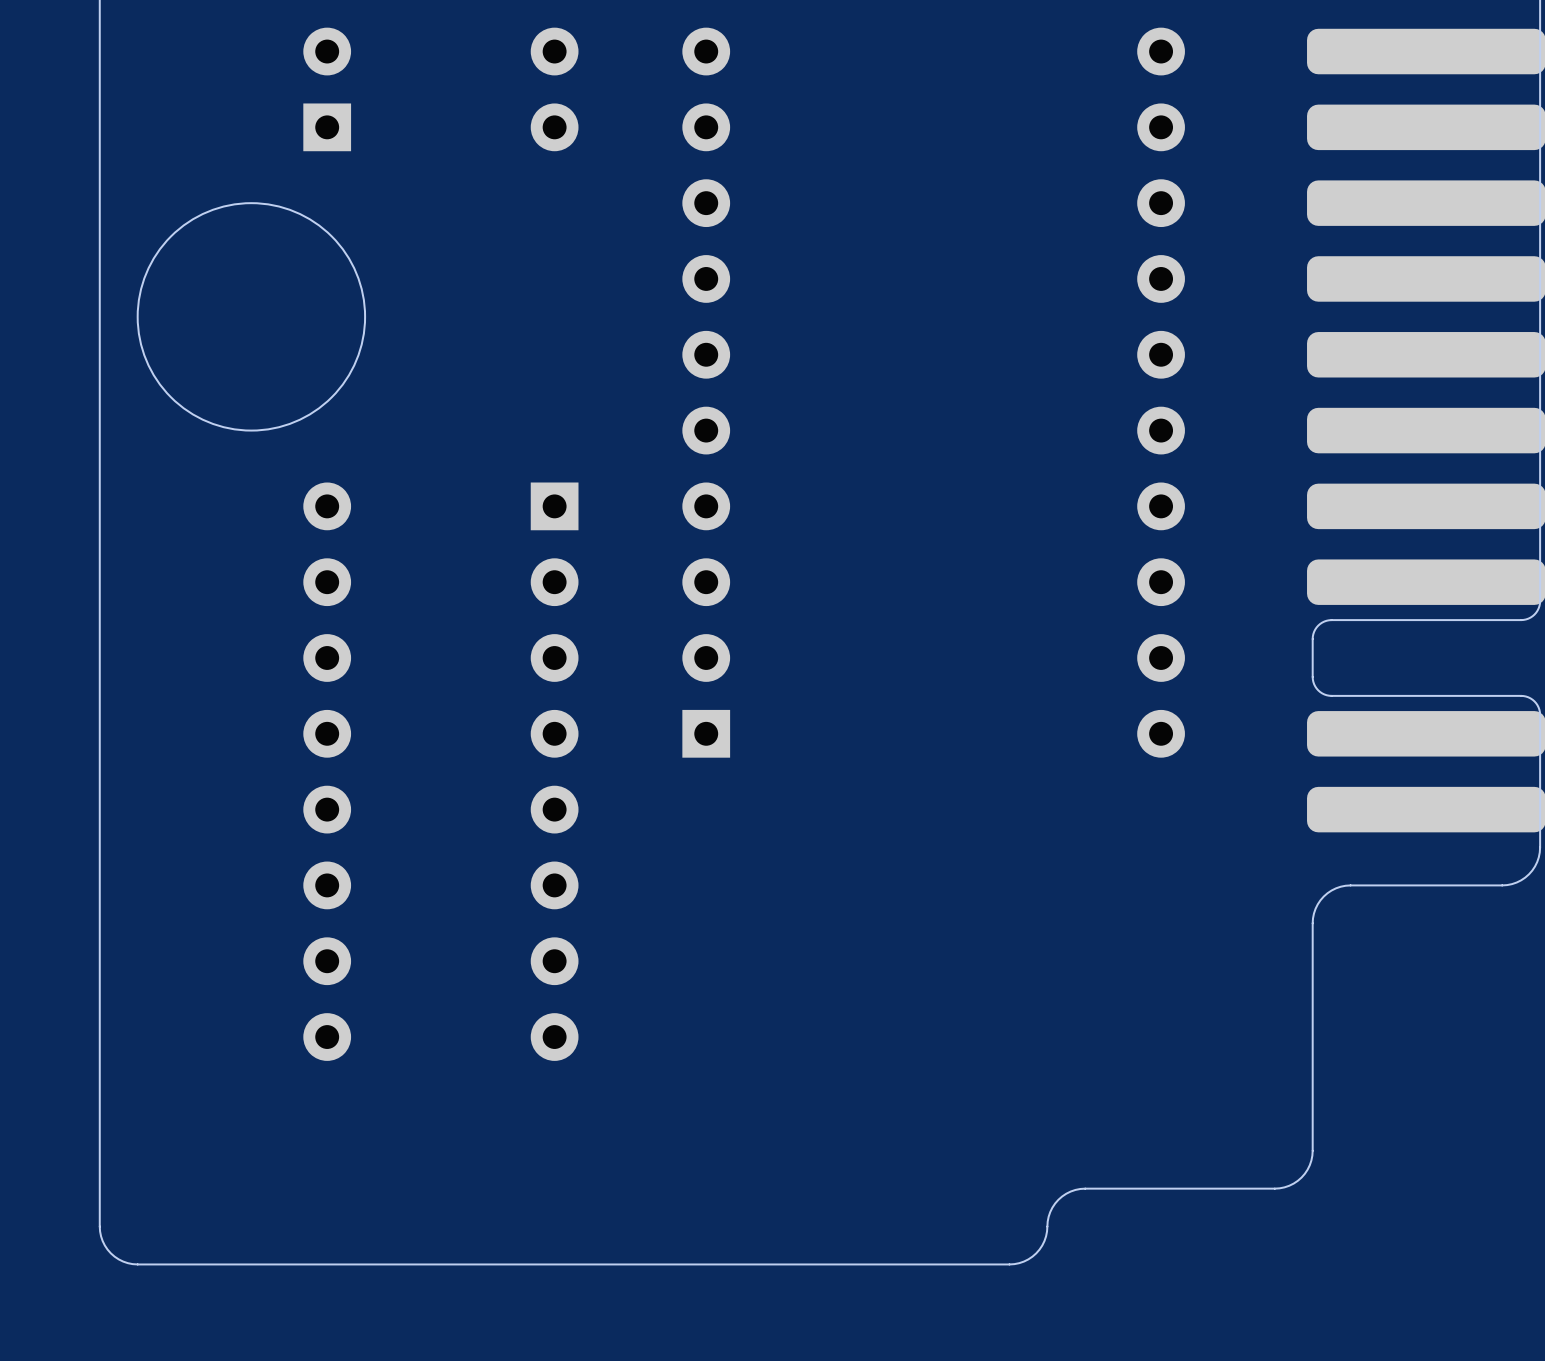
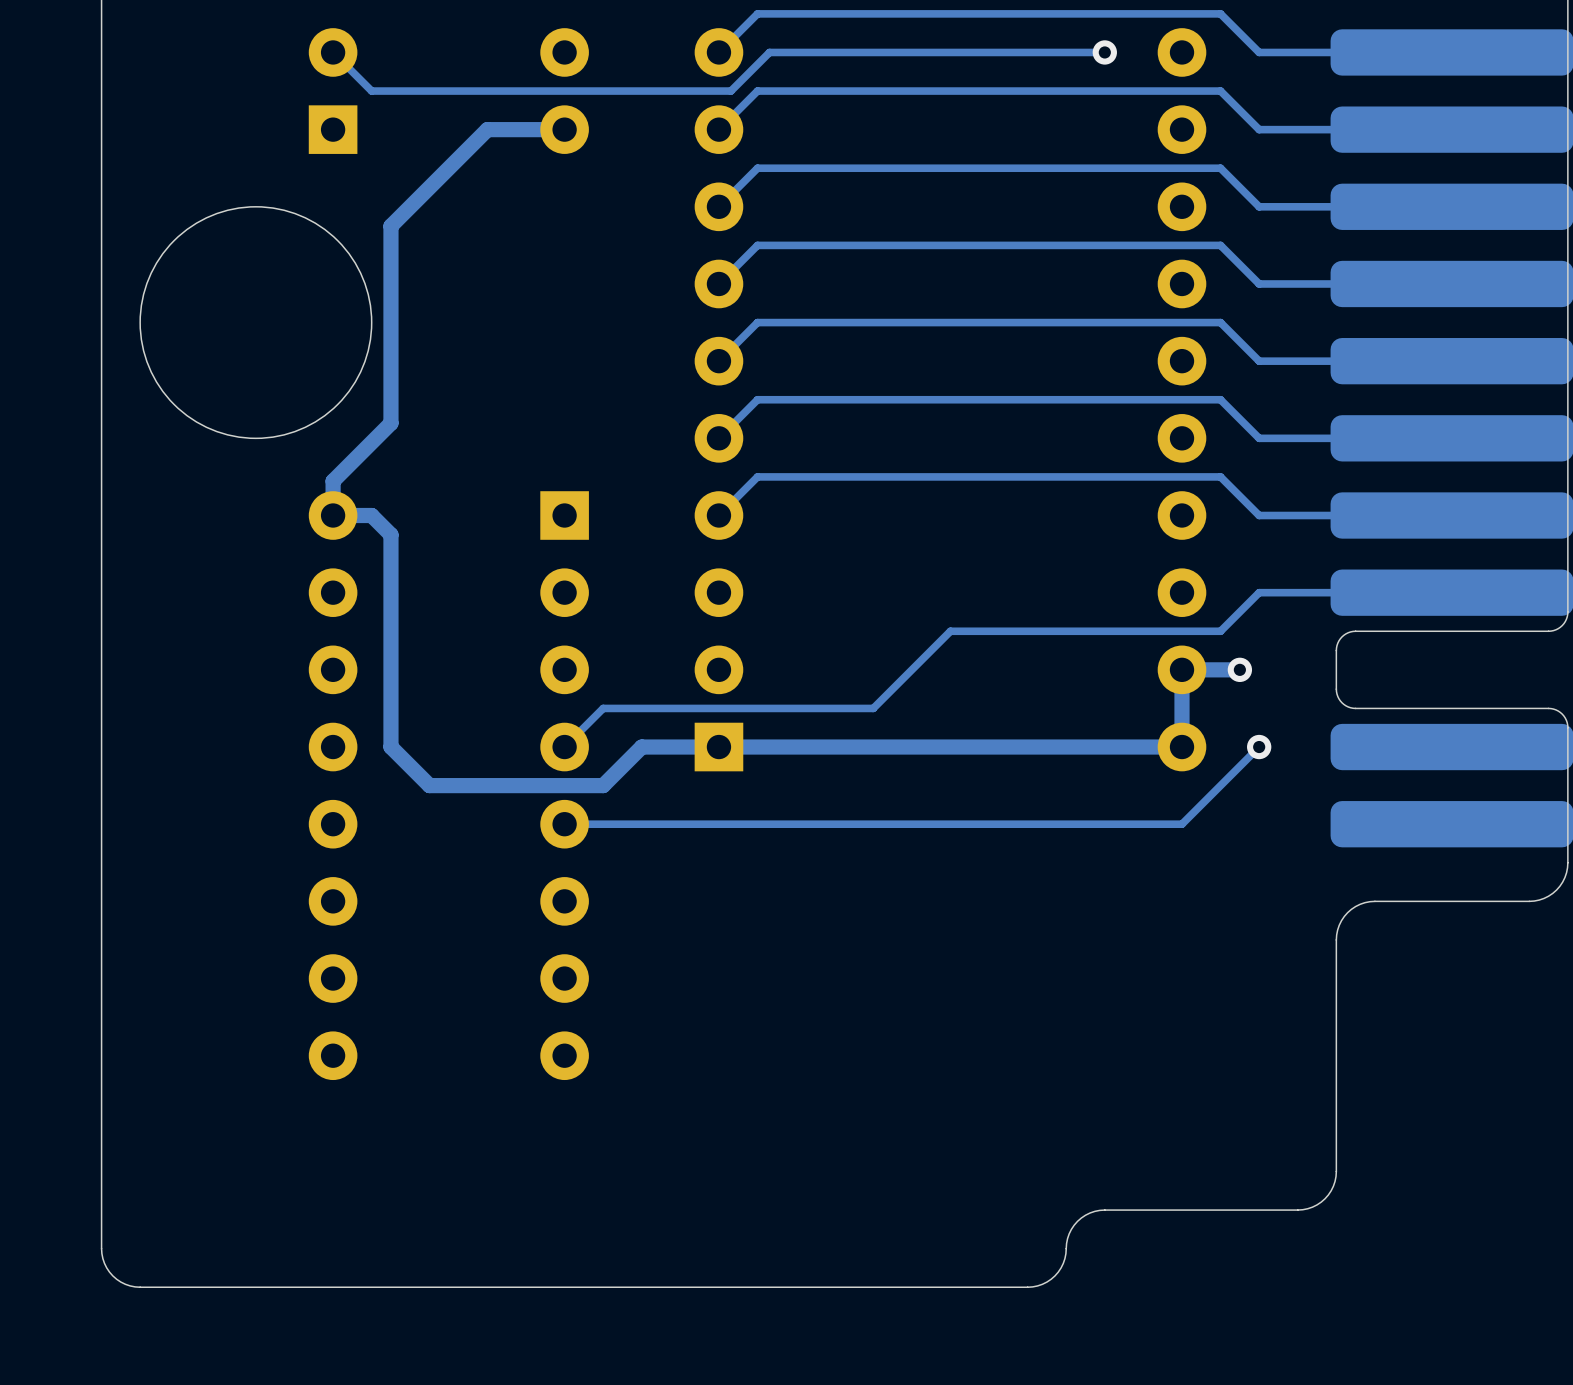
track: none -> (1104, 52) (769, 52) (730, 91) (371, 91) (333, 52)
via: none -> (1104, 52)
track: none -> (1452, 52) (1259, 52) (1220, 13) (757, 13) (718, 52)
track: none -> (564, 129) (487, 129) (390, 226) (390, 423) (333, 481) (333, 515) (371, 515) (390, 534) (390, 747) (429, 785) (603, 785) (641, 747) (1182, 747) (1182, 669) (1239, 669)
track: none -> (1452, 129) (1259, 129) (1220, 91) (757, 91) (718, 129)
track: none -> (1452, 206) (1259, 206) (1220, 168) (757, 168) (718, 206)
track: none -> (1452, 283) (1259, 283) (1220, 245) (757, 245) (718, 283)
track: none -> (1452, 361) (1259, 361) (1220, 322) (757, 322) (718, 361)
track: none -> (1452, 438) (1259, 438) (1220, 399) (757, 399) (718, 438)
track: none -> (1452, 515) (1259, 515) (1220, 476) (757, 476) (718, 515)
track: none -> (1452, 592) (1259, 592) (1220, 631) (950, 631) (873, 708) (603, 708) (564, 747)
via: none -> (1239, 669)
track: none -> (1259, 747) (1182, 824) (564, 824)
via: none -> (1259, 747)

